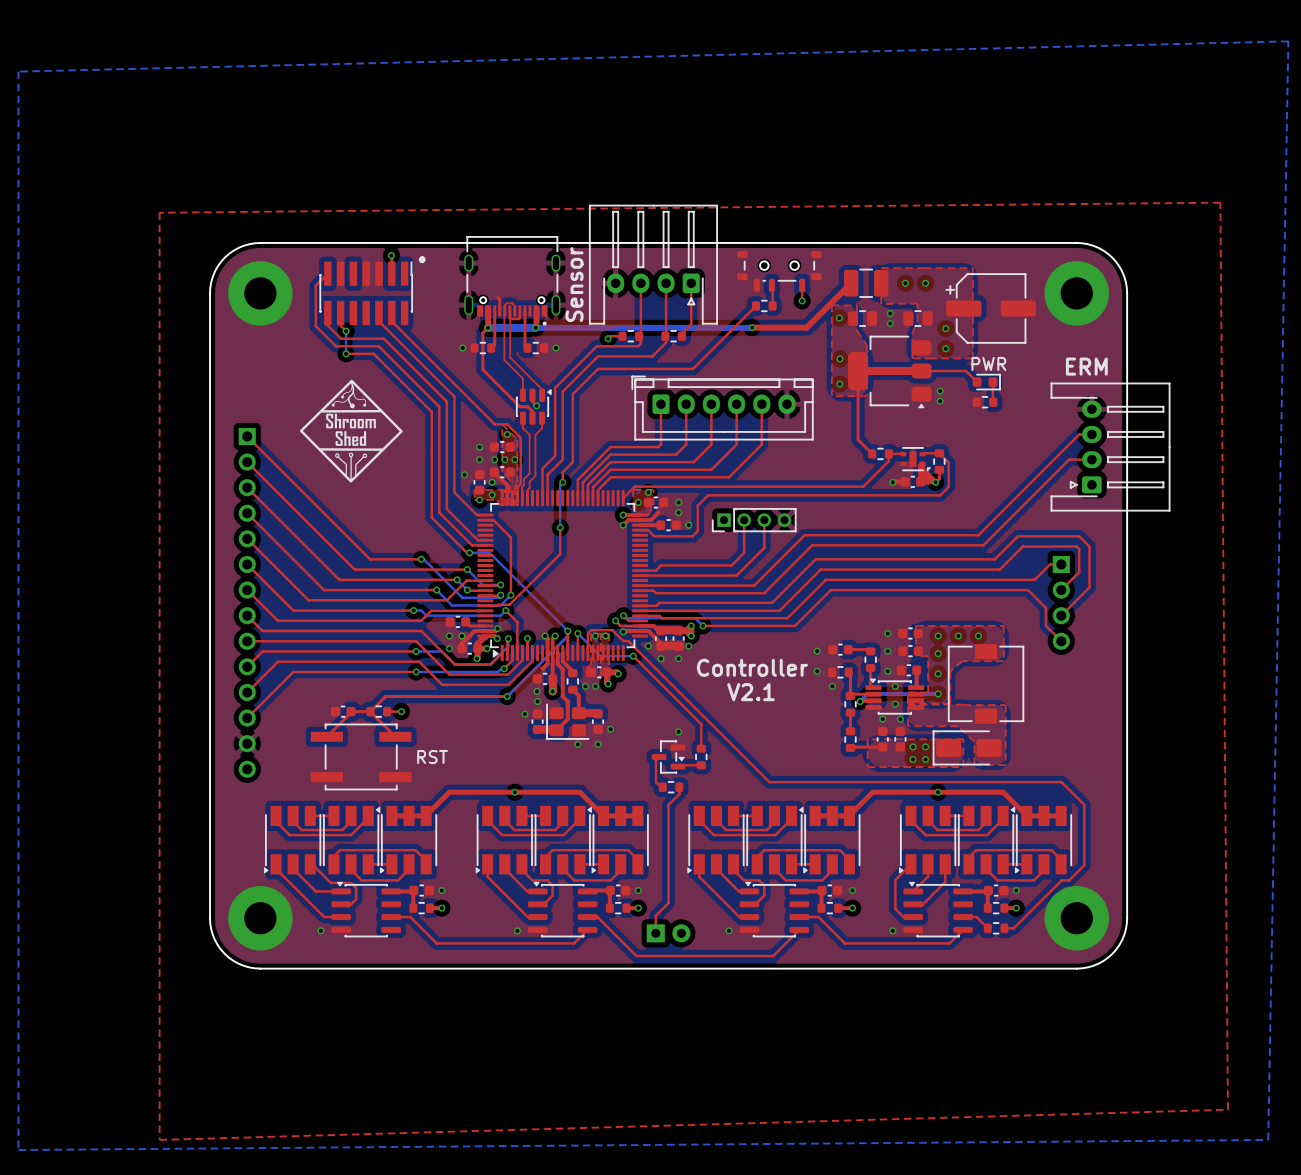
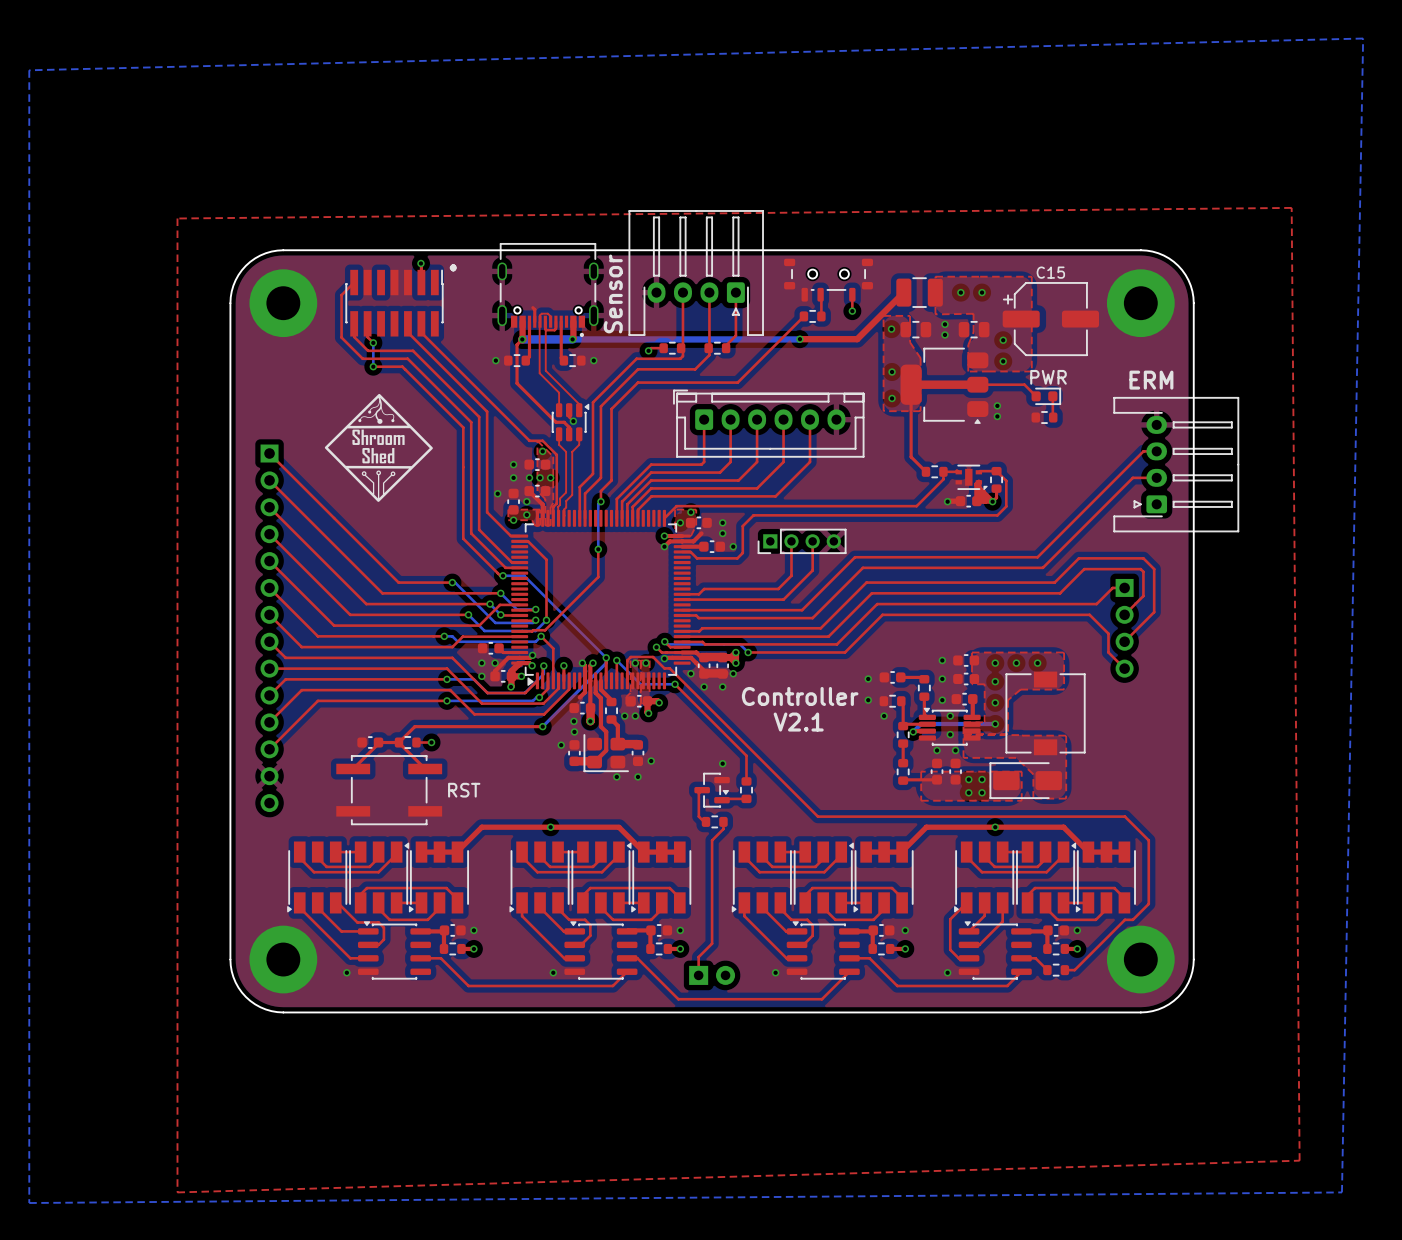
part: (990, 308) -> none
C15: none -> (1050, 319)

